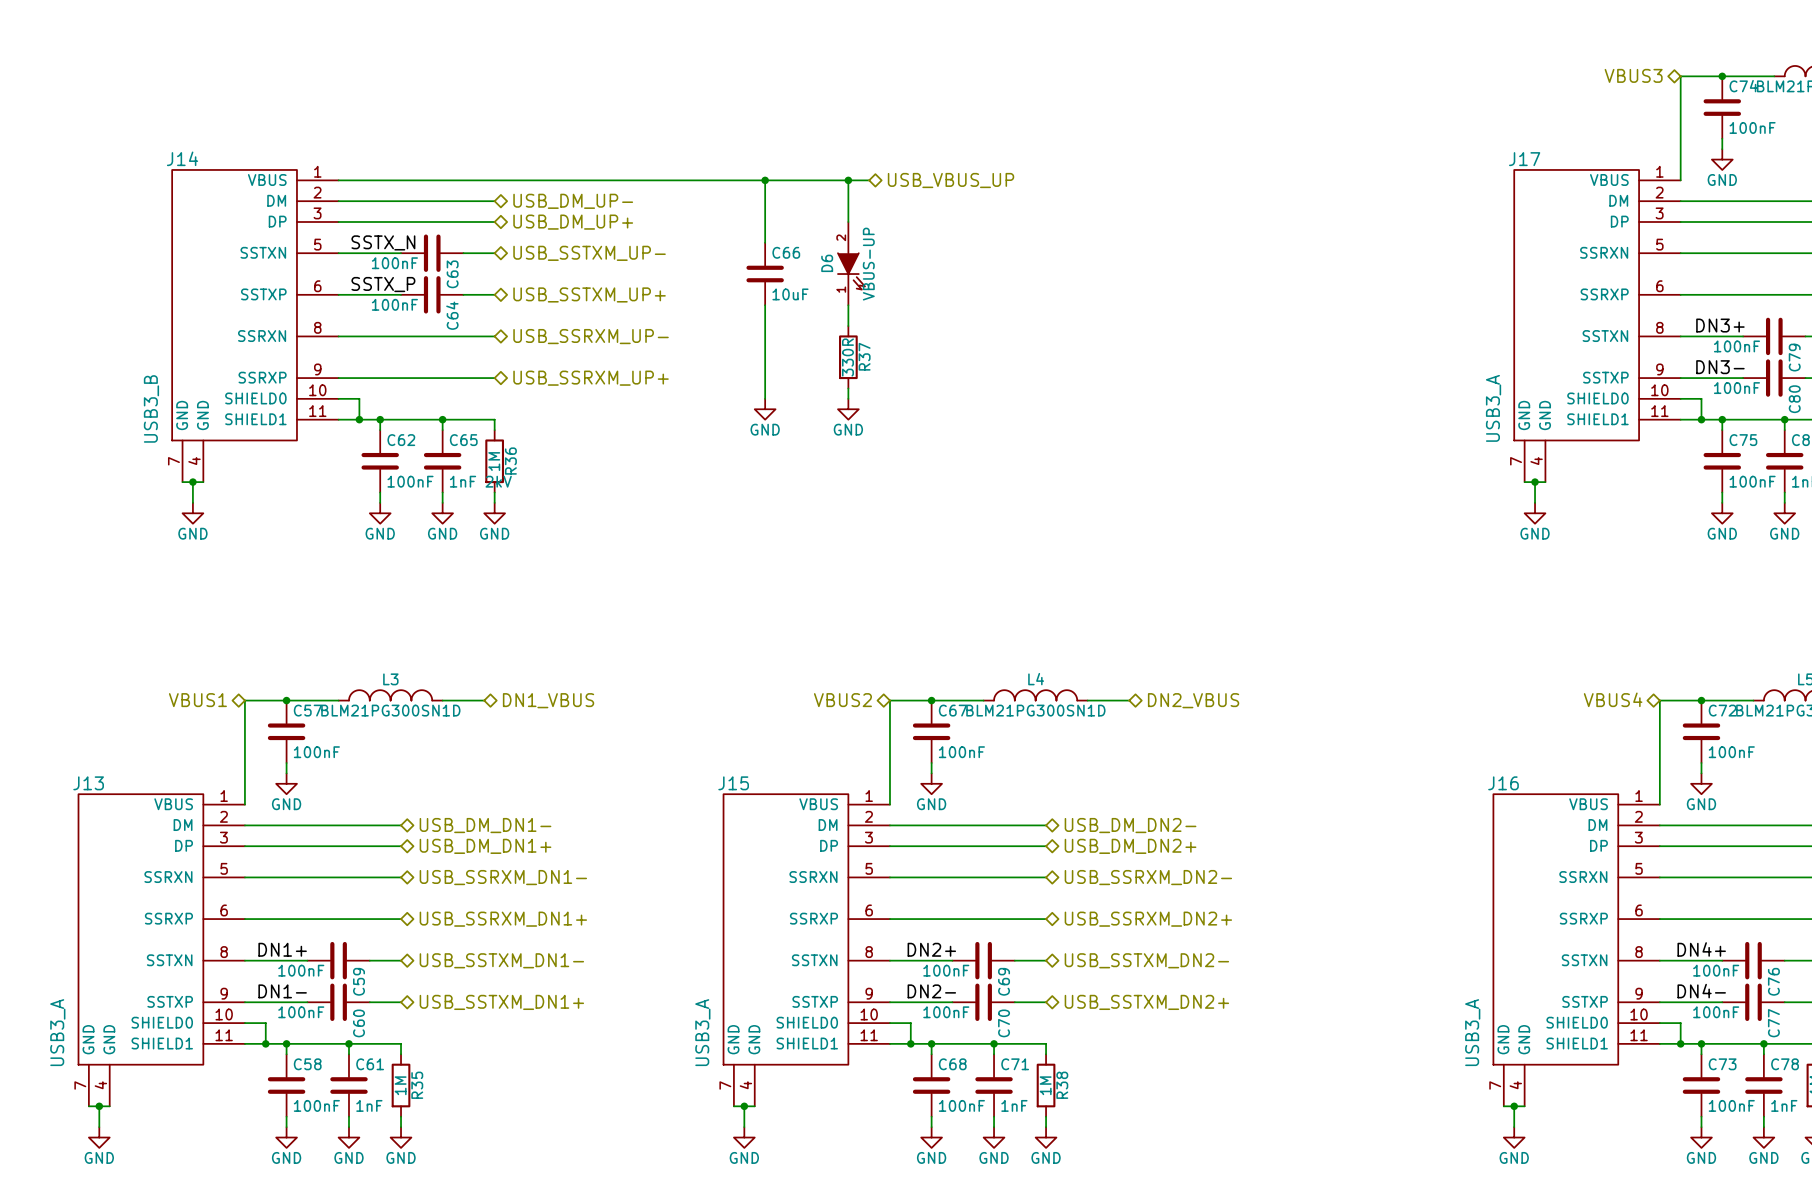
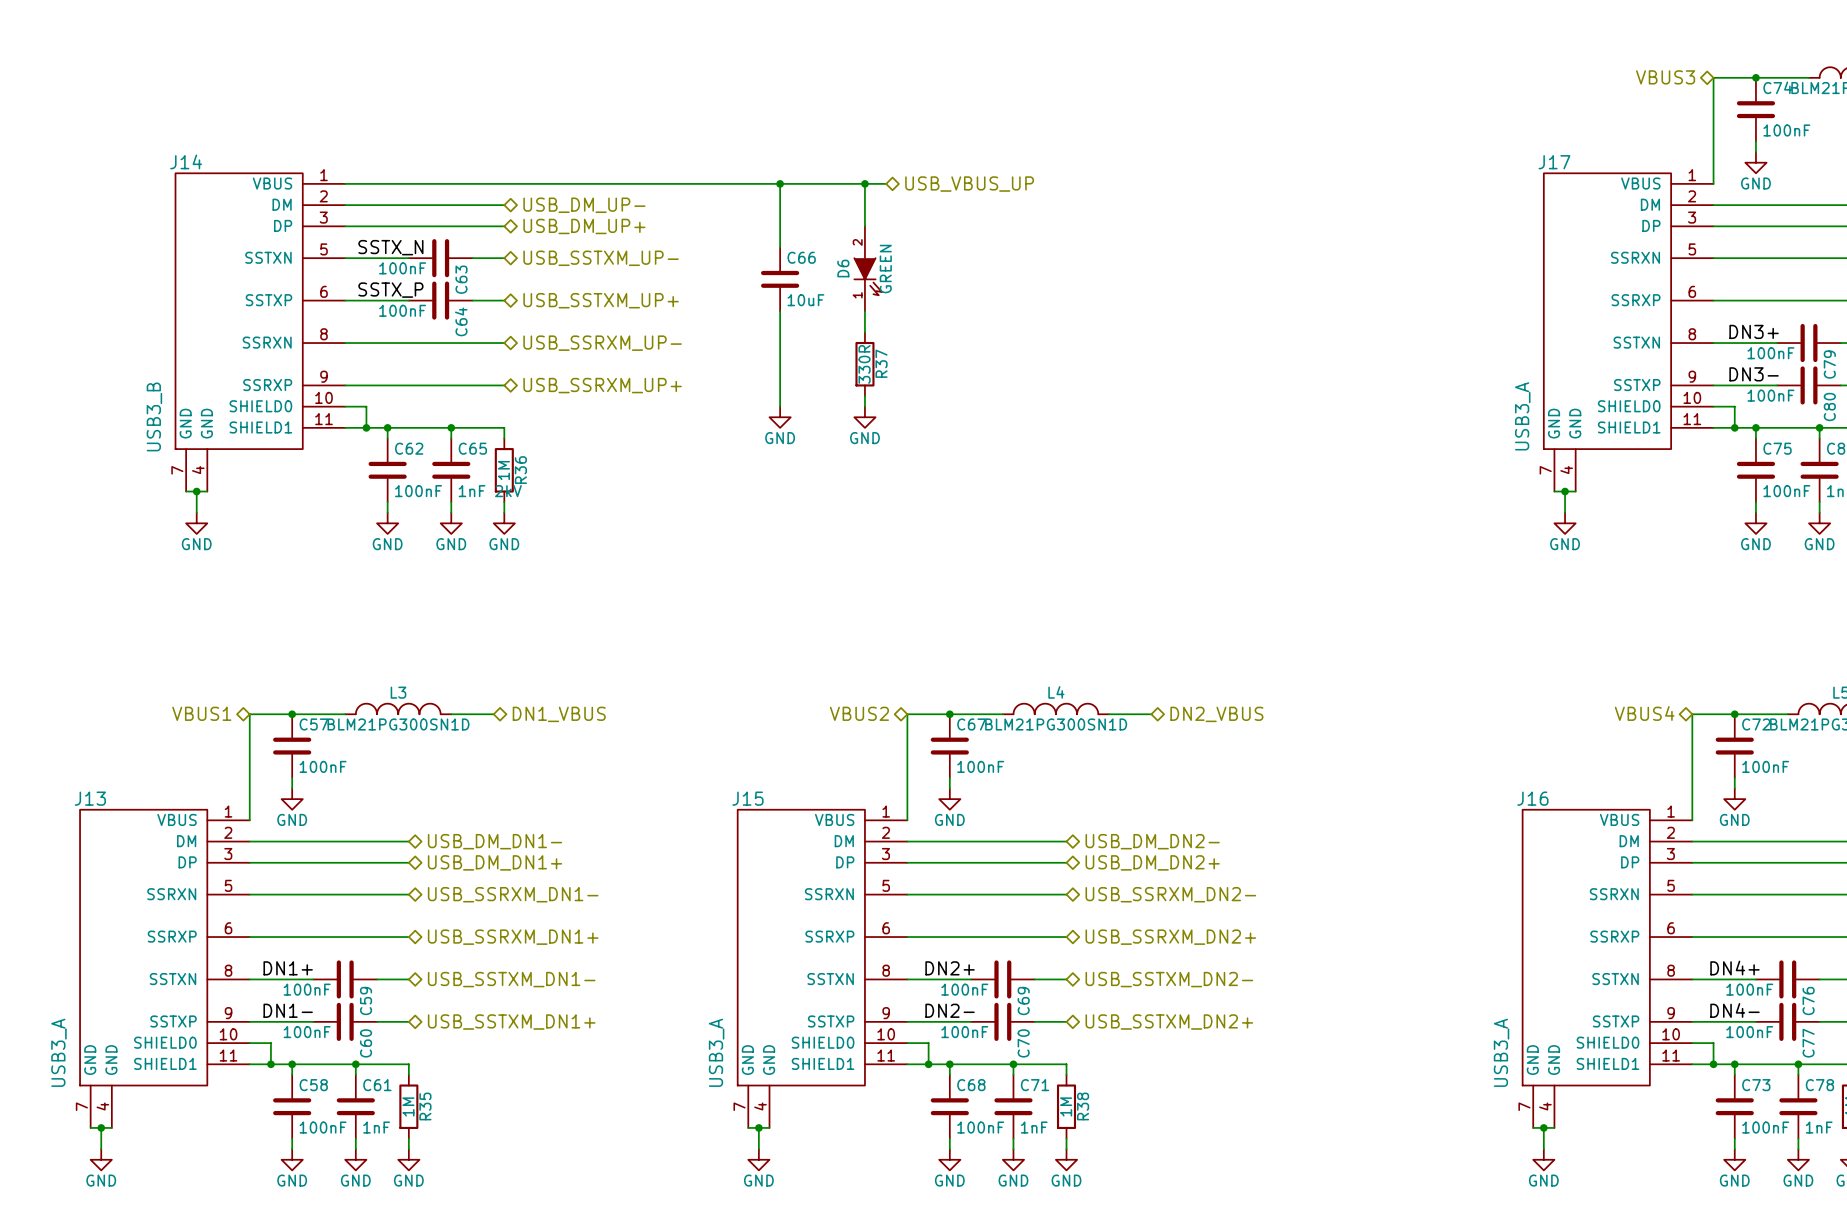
D6 value: VBUS-UP (868, 264) -> GREEN (885, 269)

